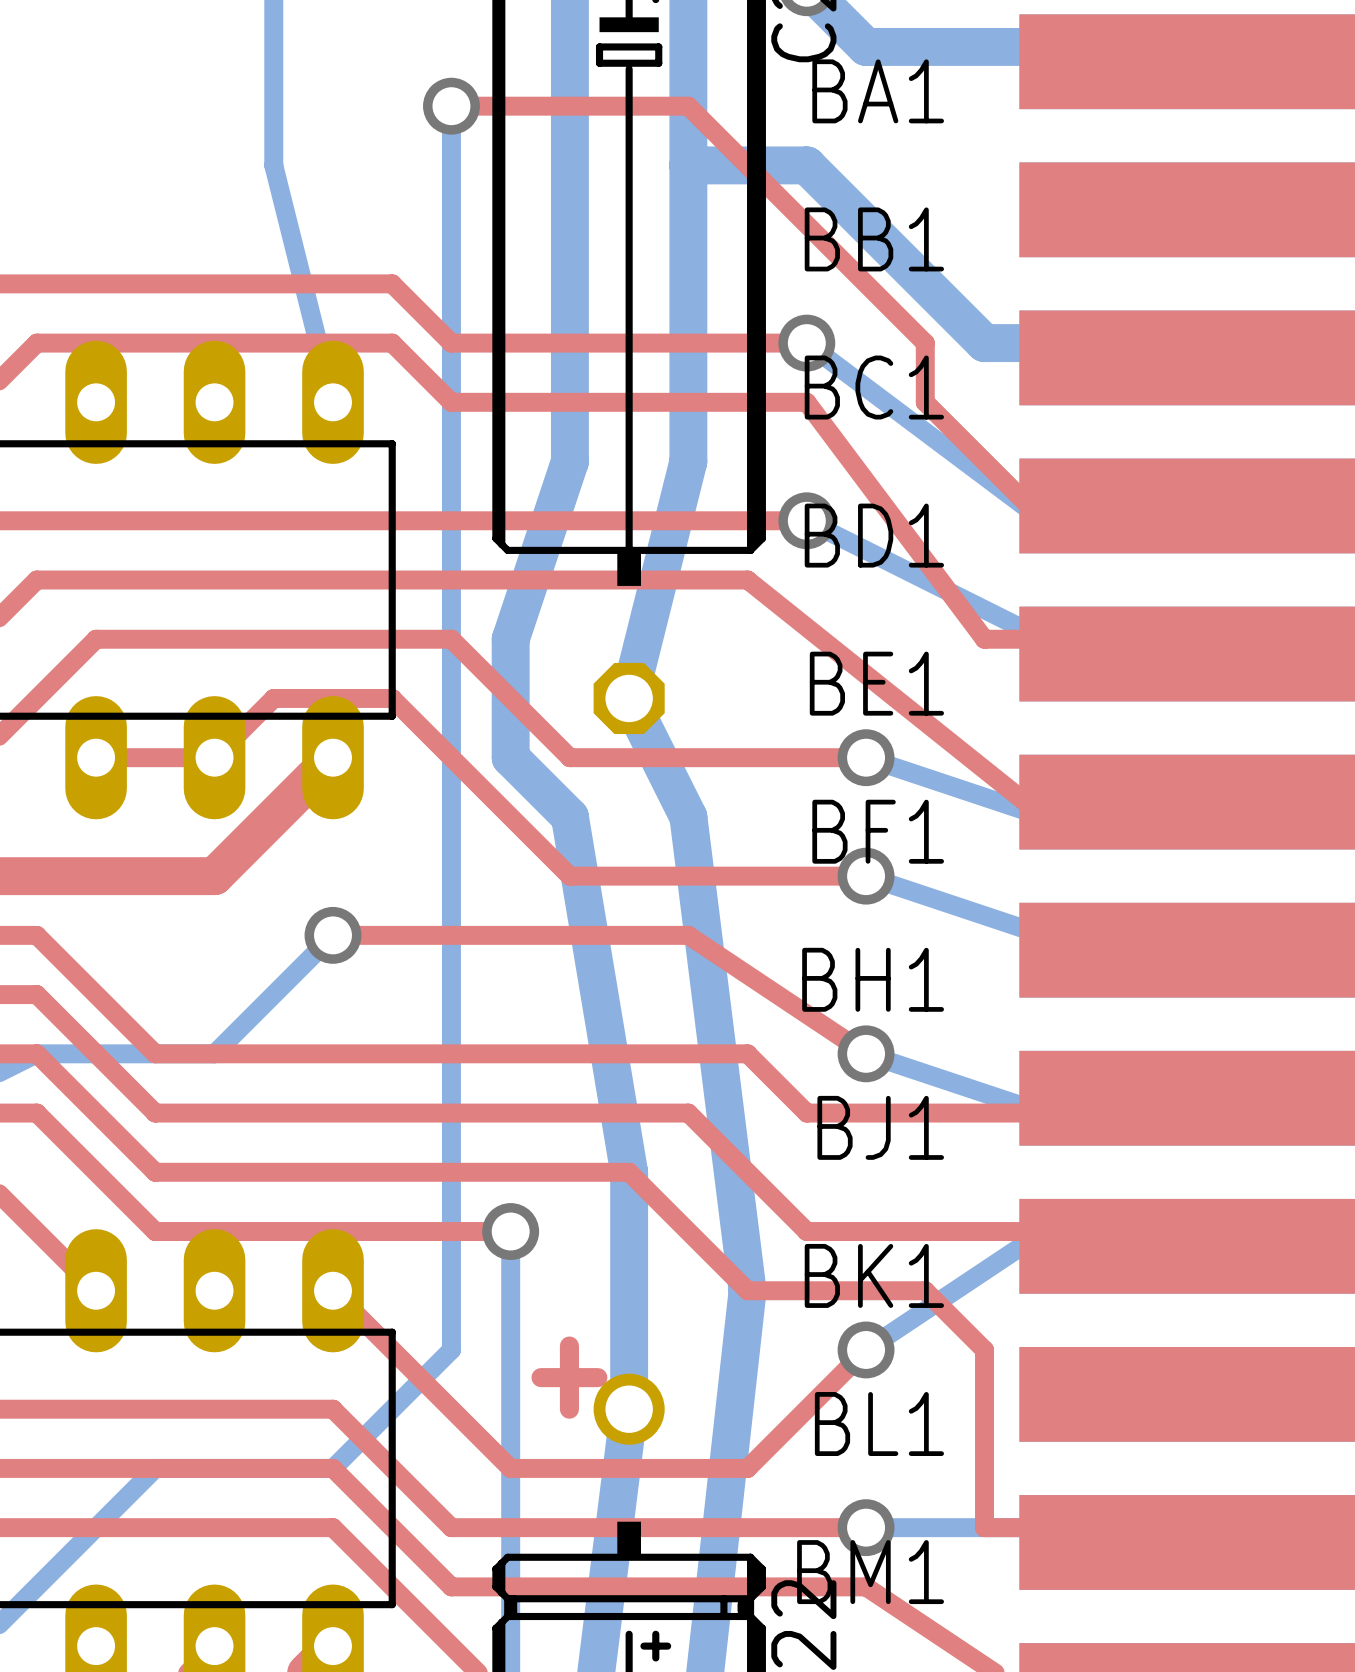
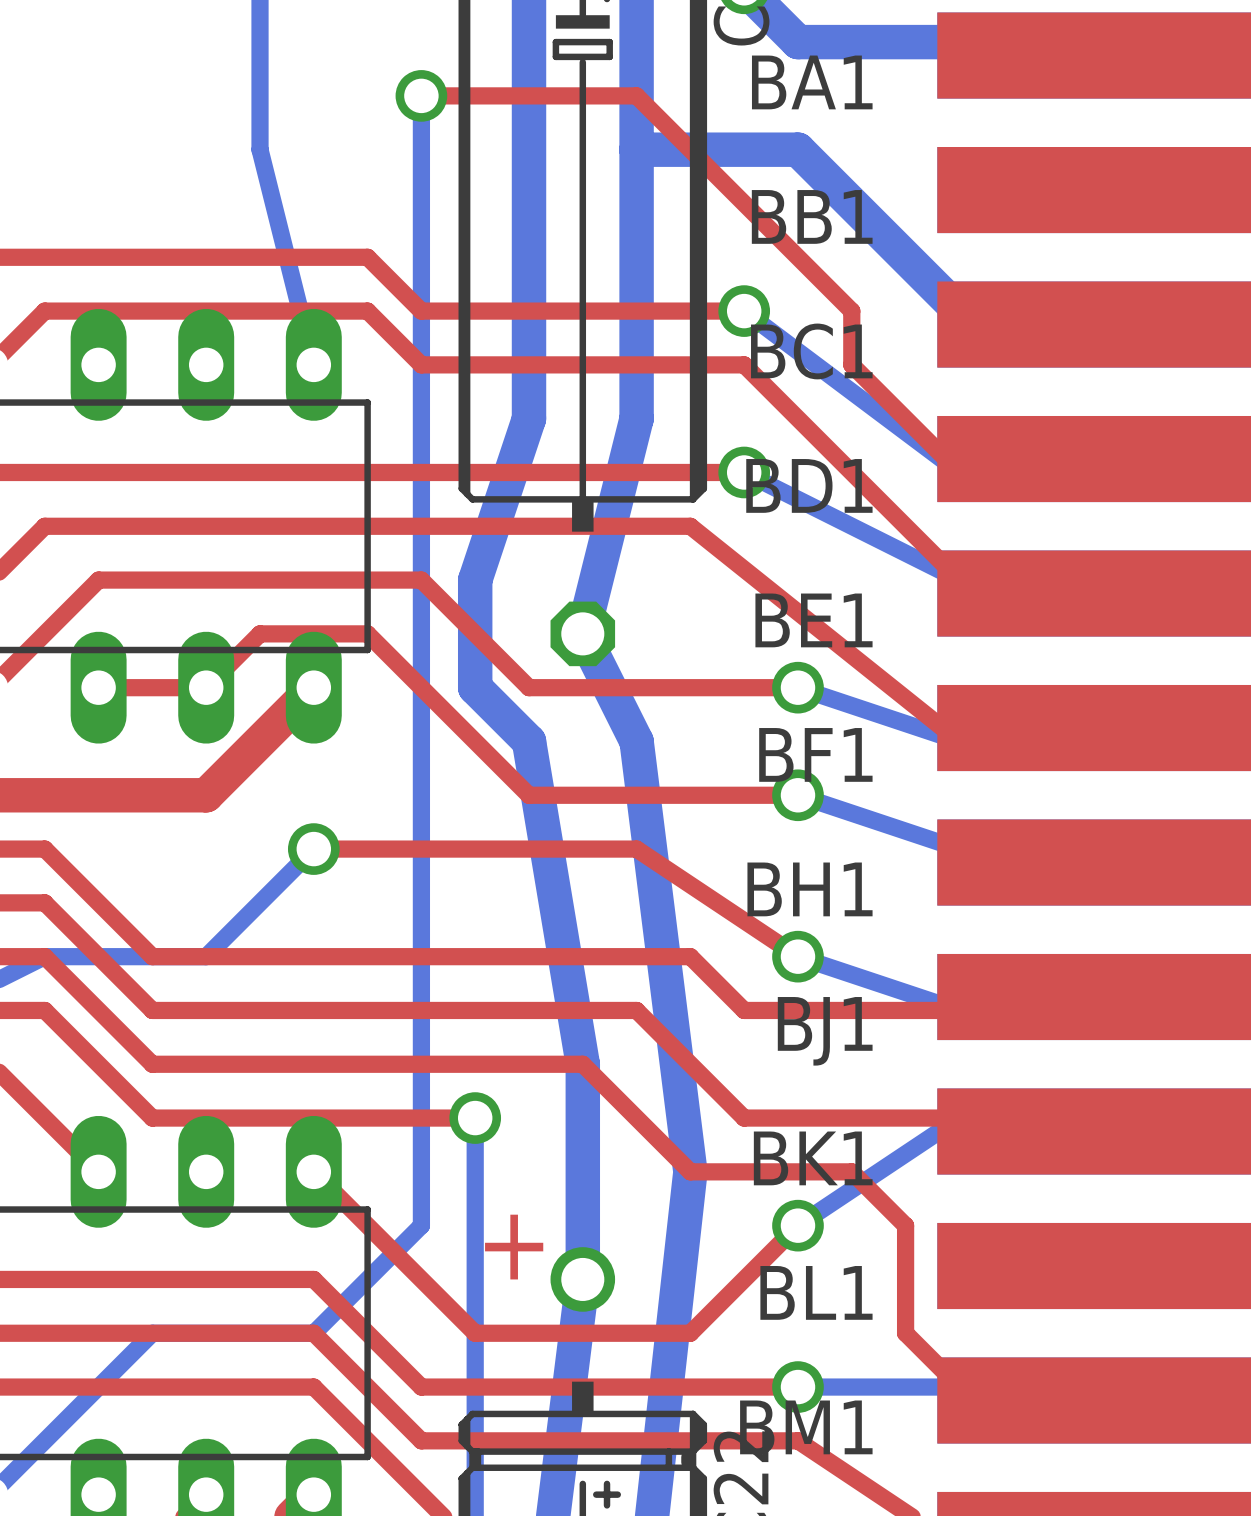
bottom track: (806, 165) (984, 343) (1043, 343) -> (744, 149) (797, 149) (959, 311)
top track: (806, 402) (984, 639) (1043, 639) -> (744, 364) (959, 580)
top track: (984, 1468) (984, 1527) (1043, 1527) -> (905, 1333) (959, 1387)

